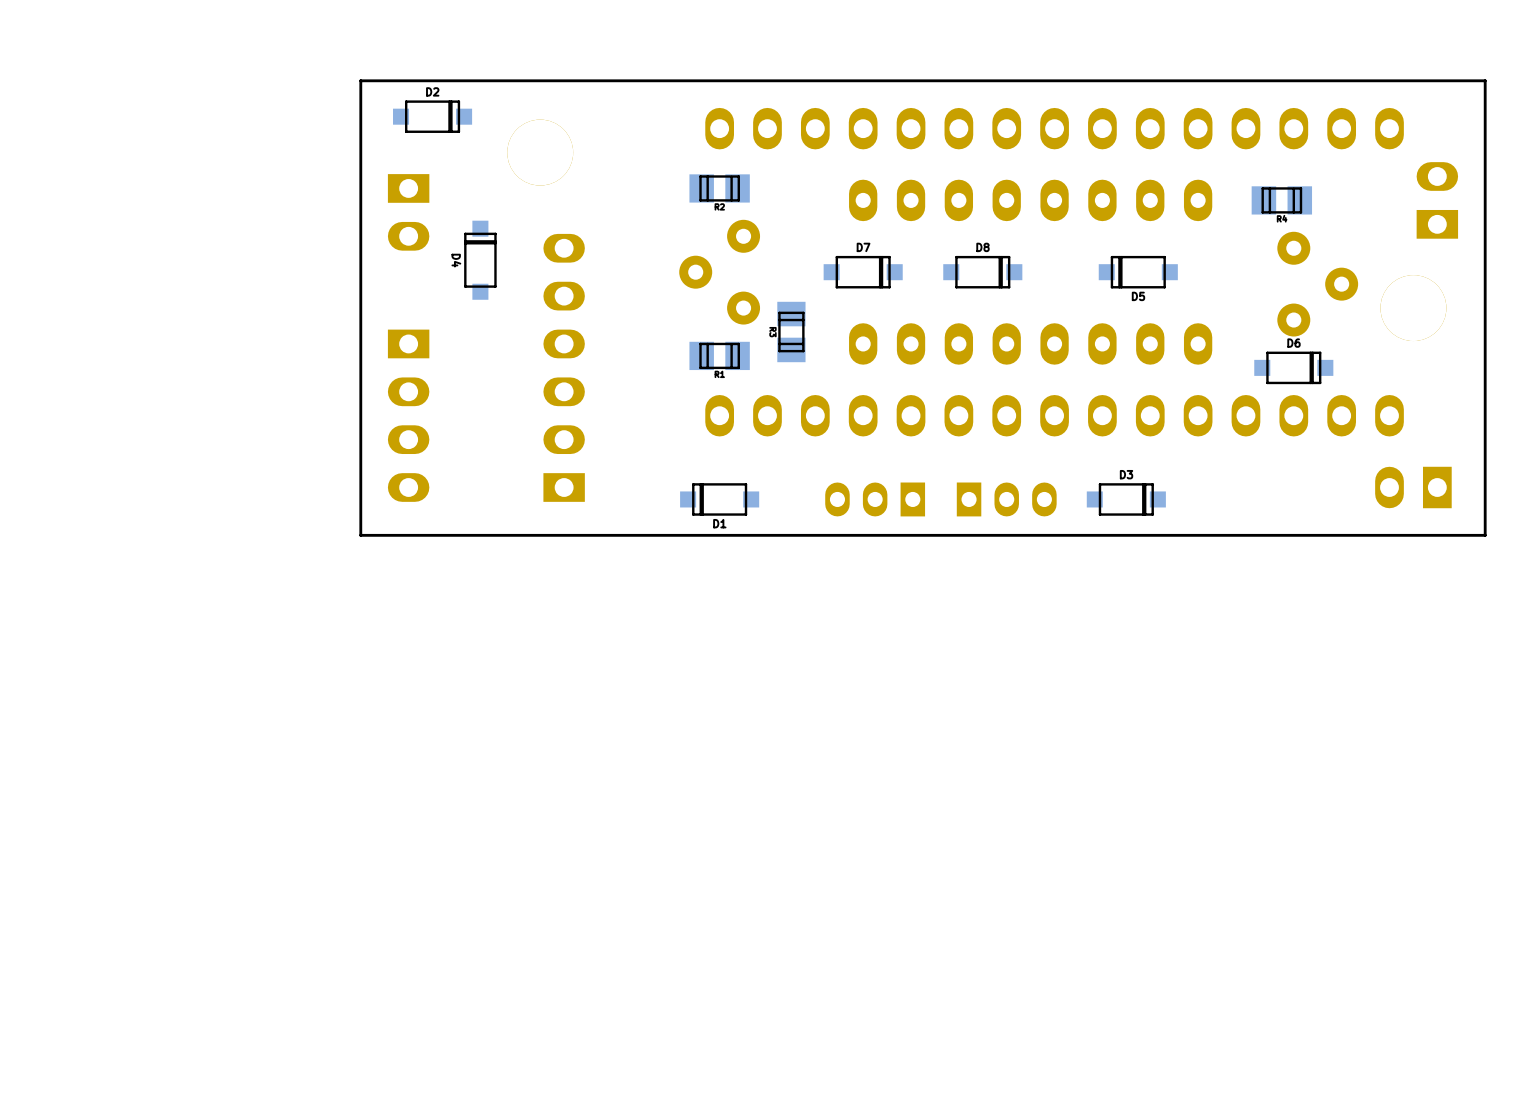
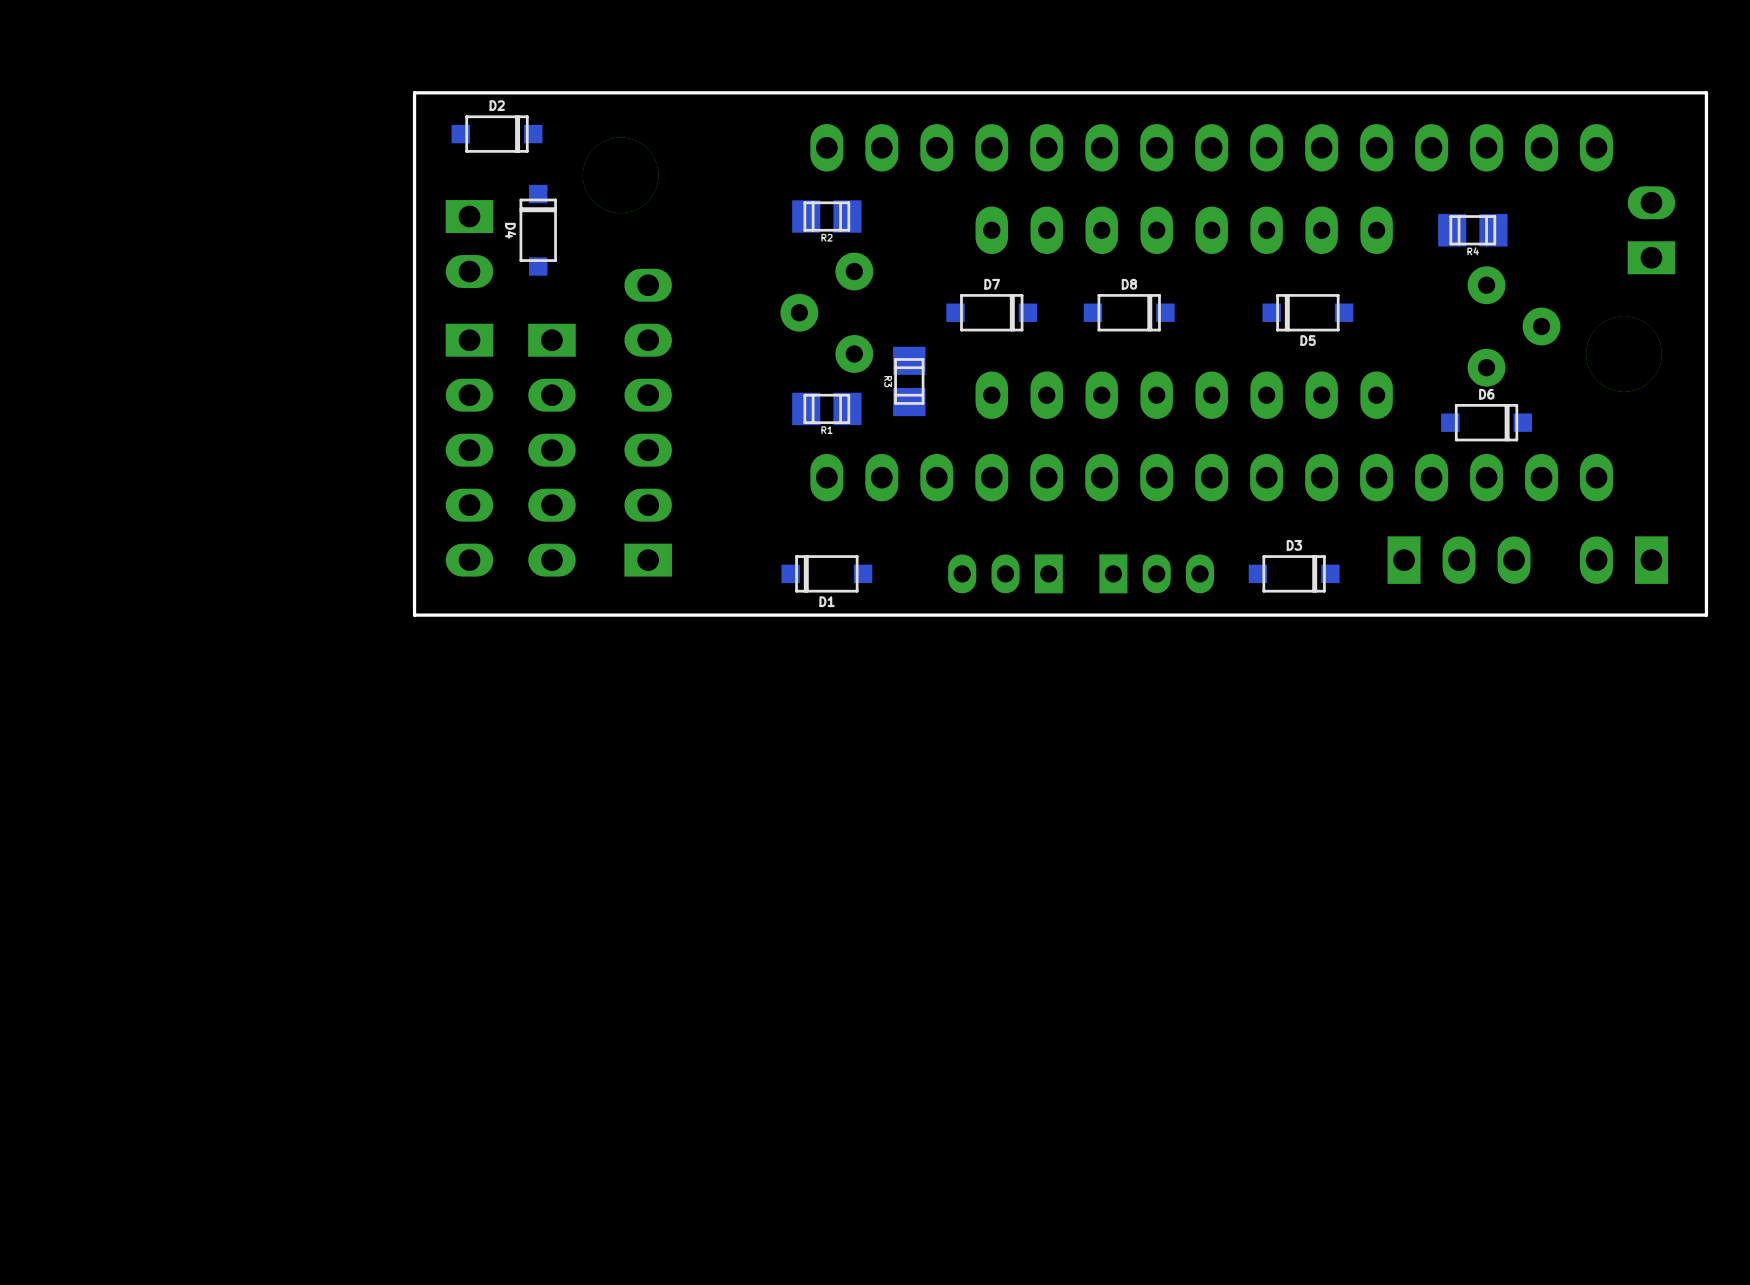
D4 position: (480, 260) -> (538, 230)
part: none -> (469, 450)
part: none -> (551, 450)
part: (408, 415) -> none
part: none -> (1459, 560)

